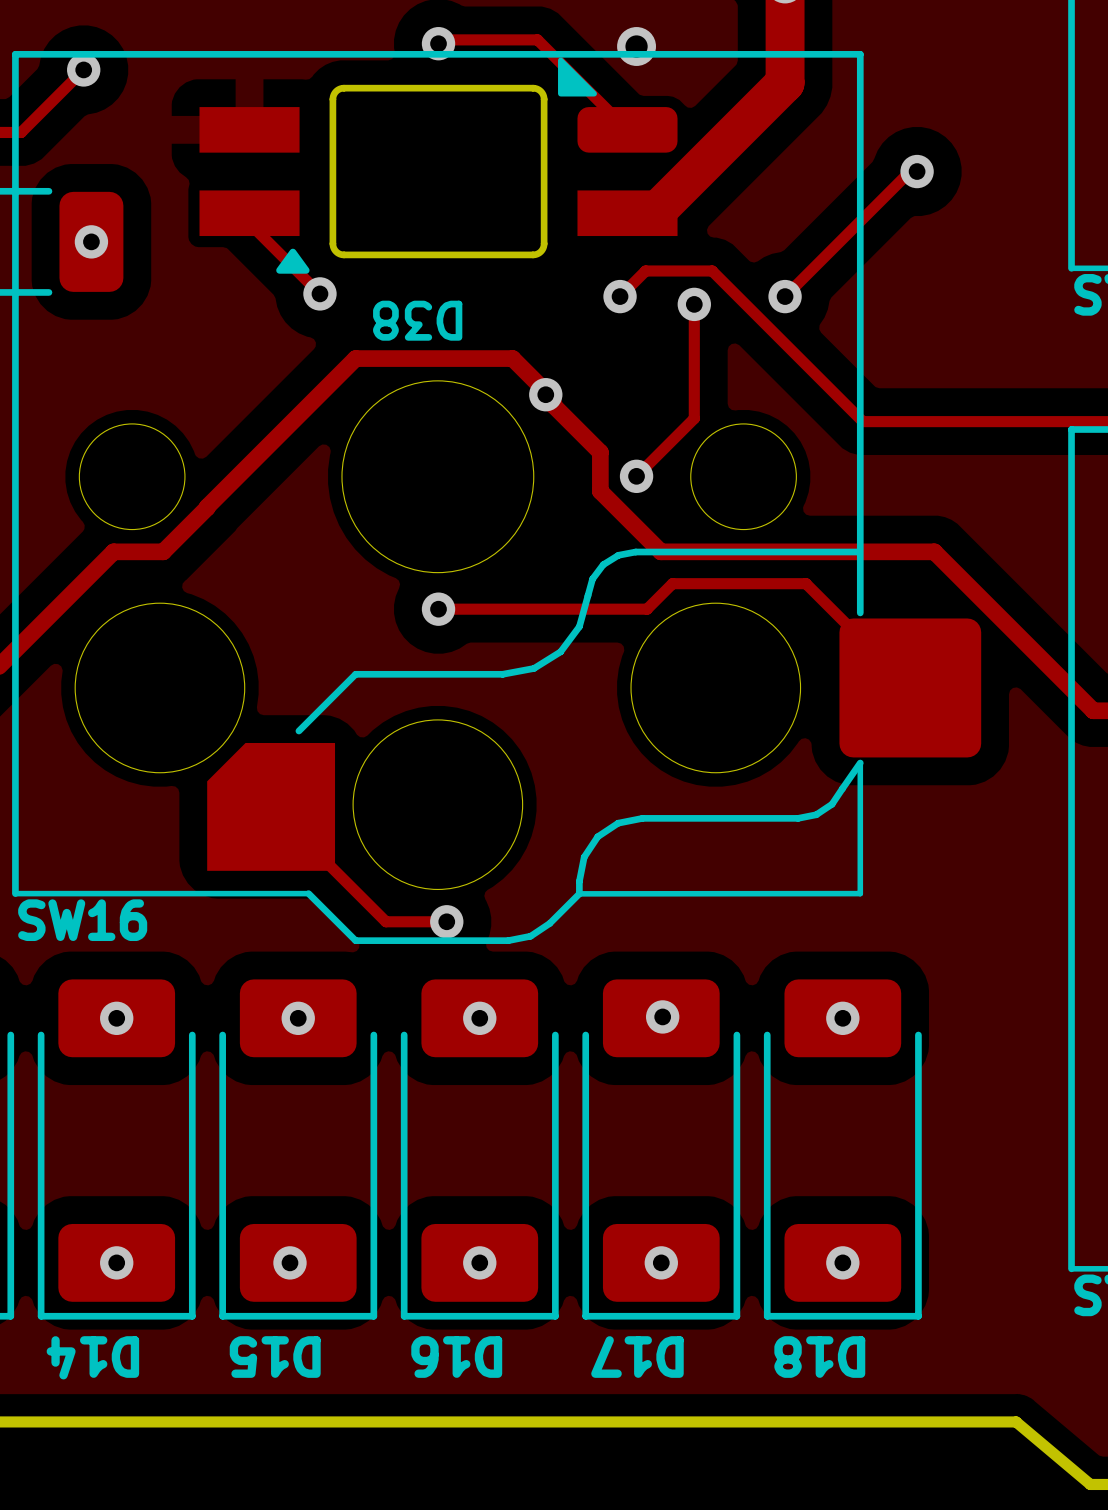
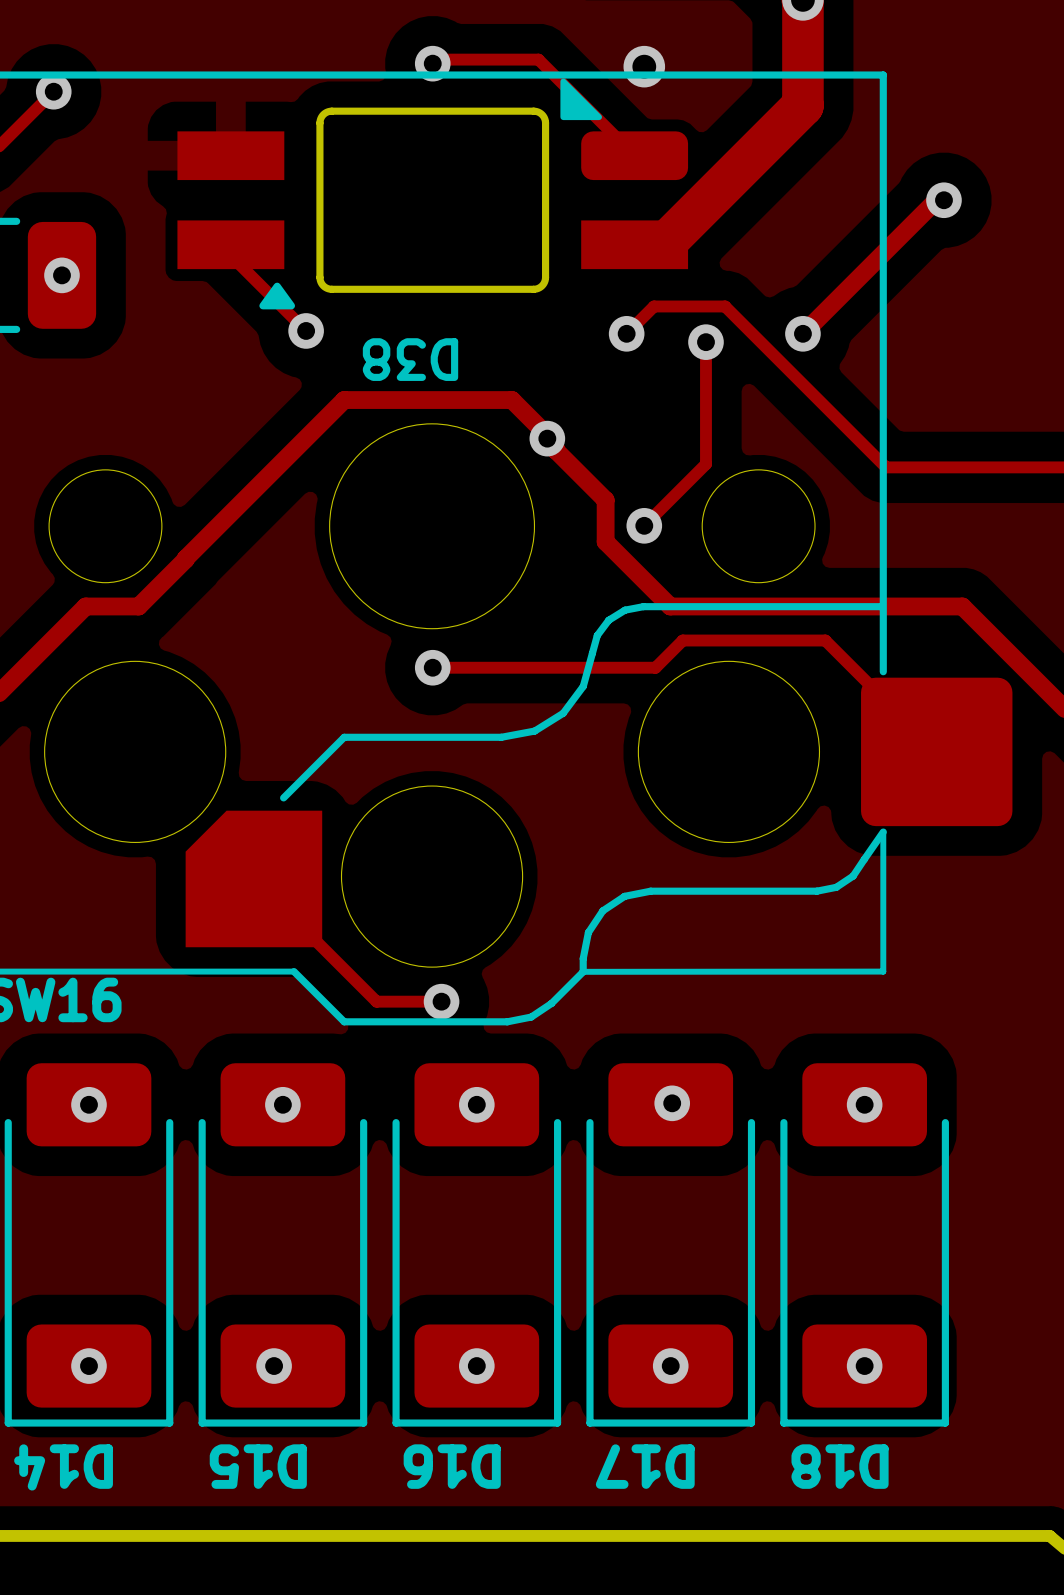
track width: thin (910, 171) (785, 296) -> thick (936, 200) (802, 333)

